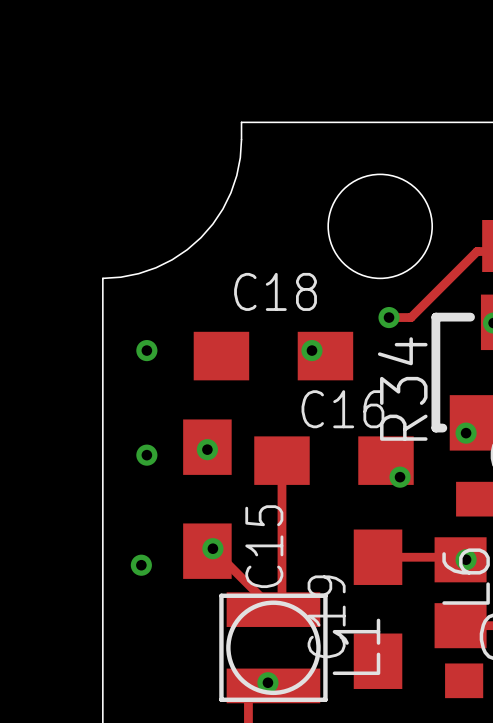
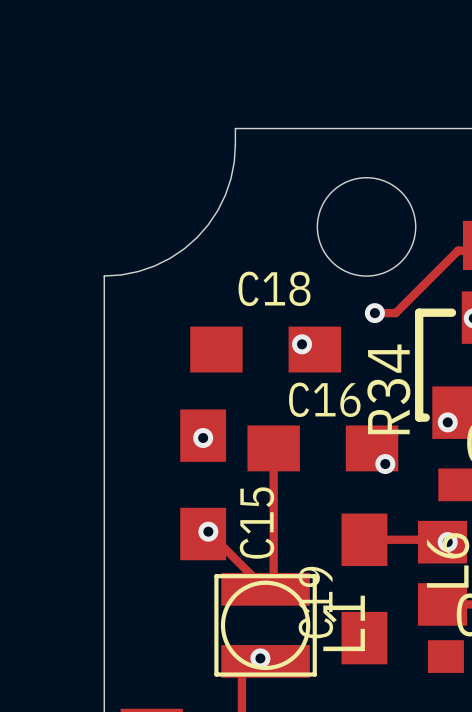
via: (146, 350) -> none
via: (146, 455) -> none
via: (141, 565) -> none

